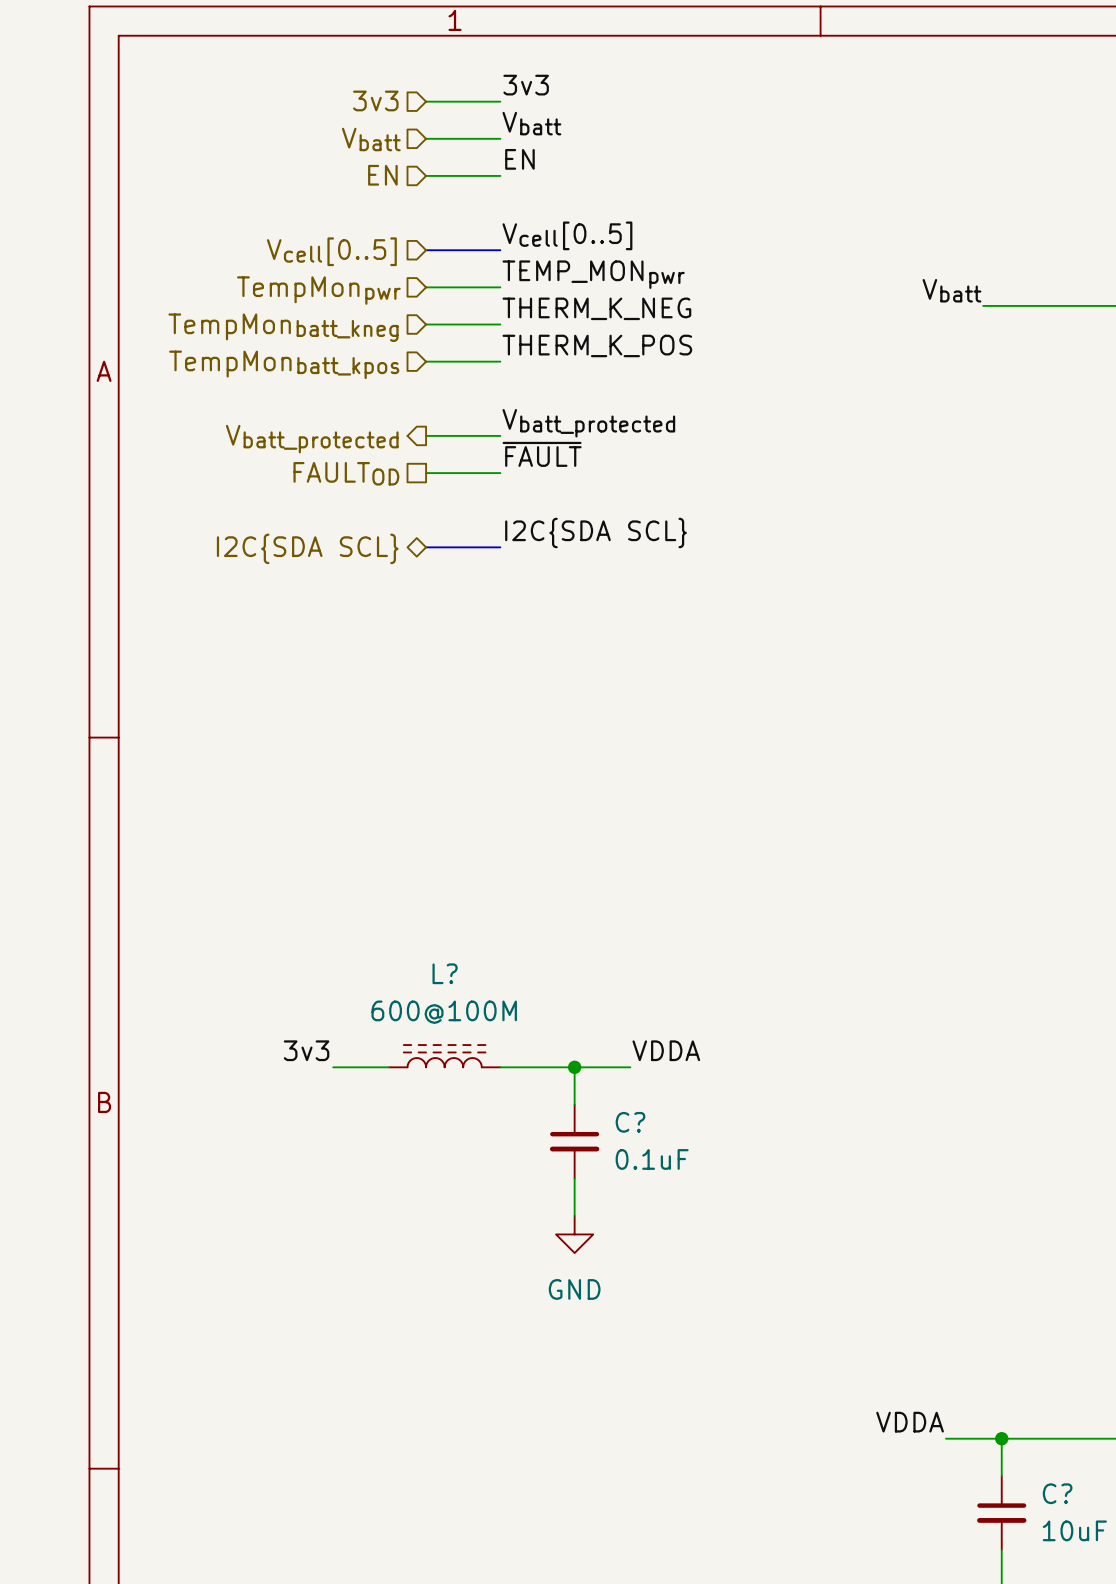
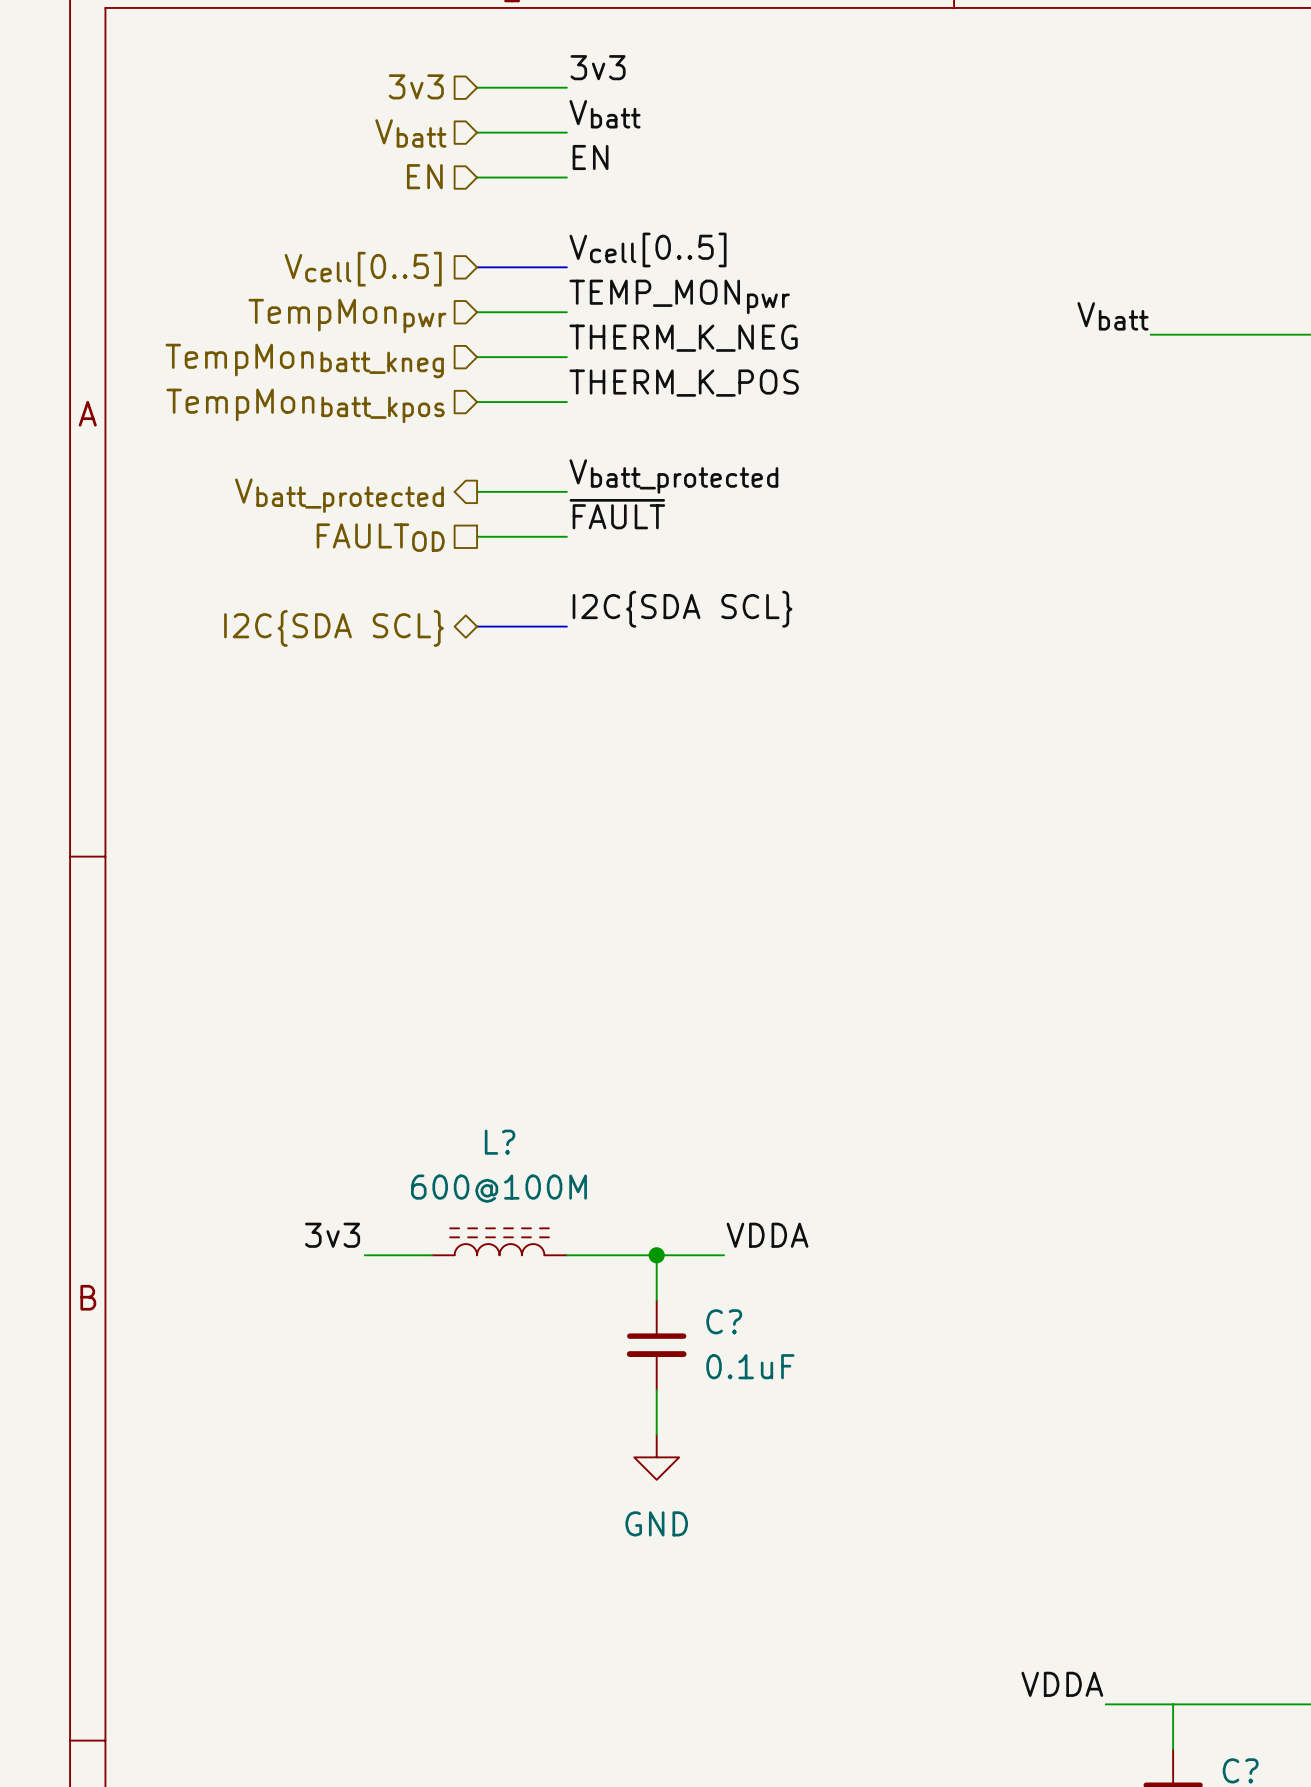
junction: (1001, 1438) -> none

